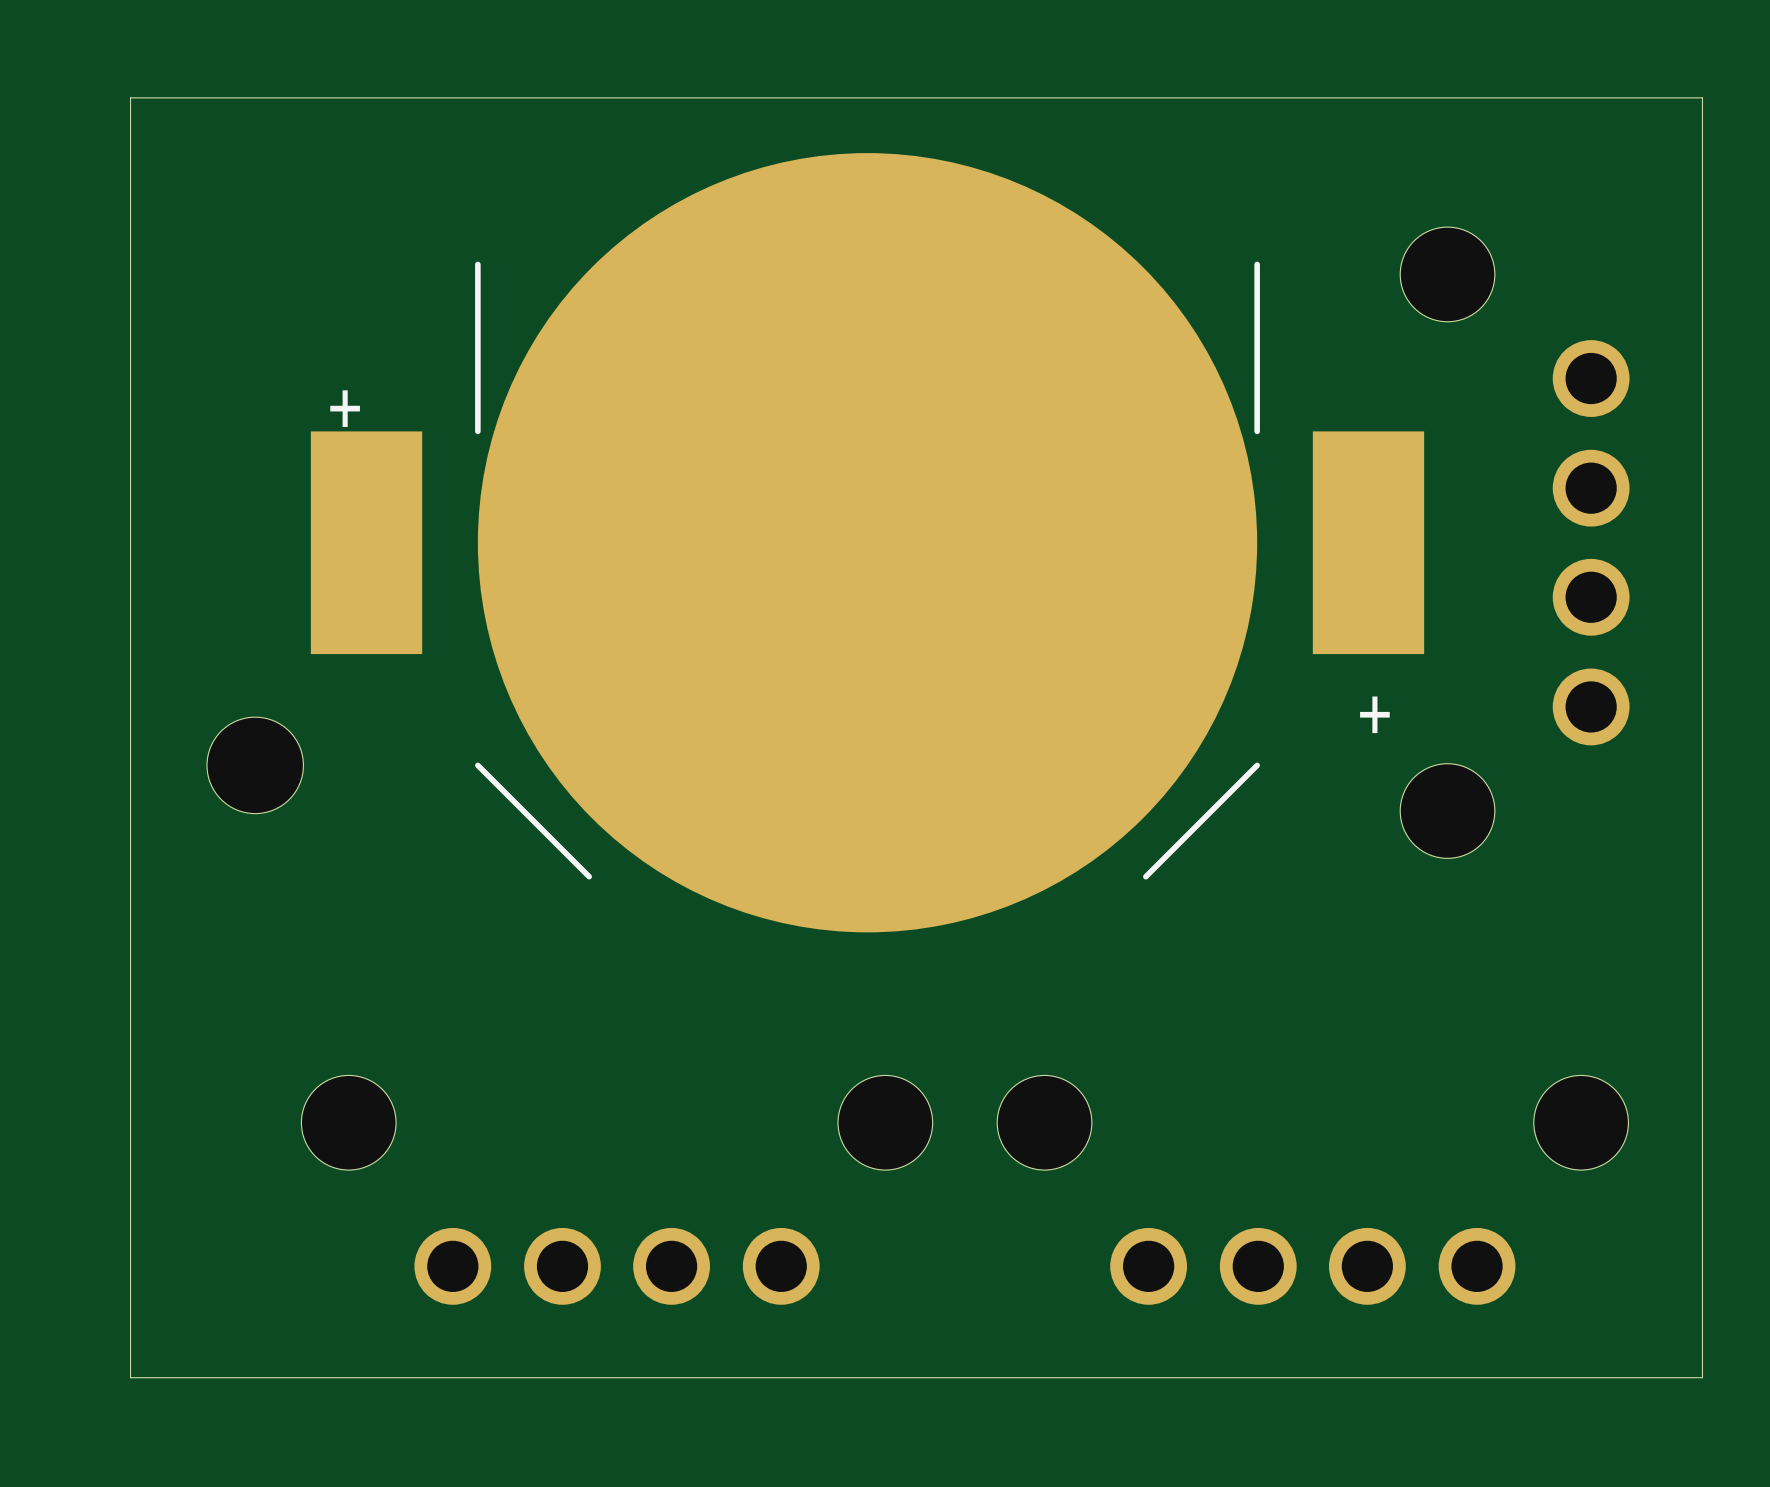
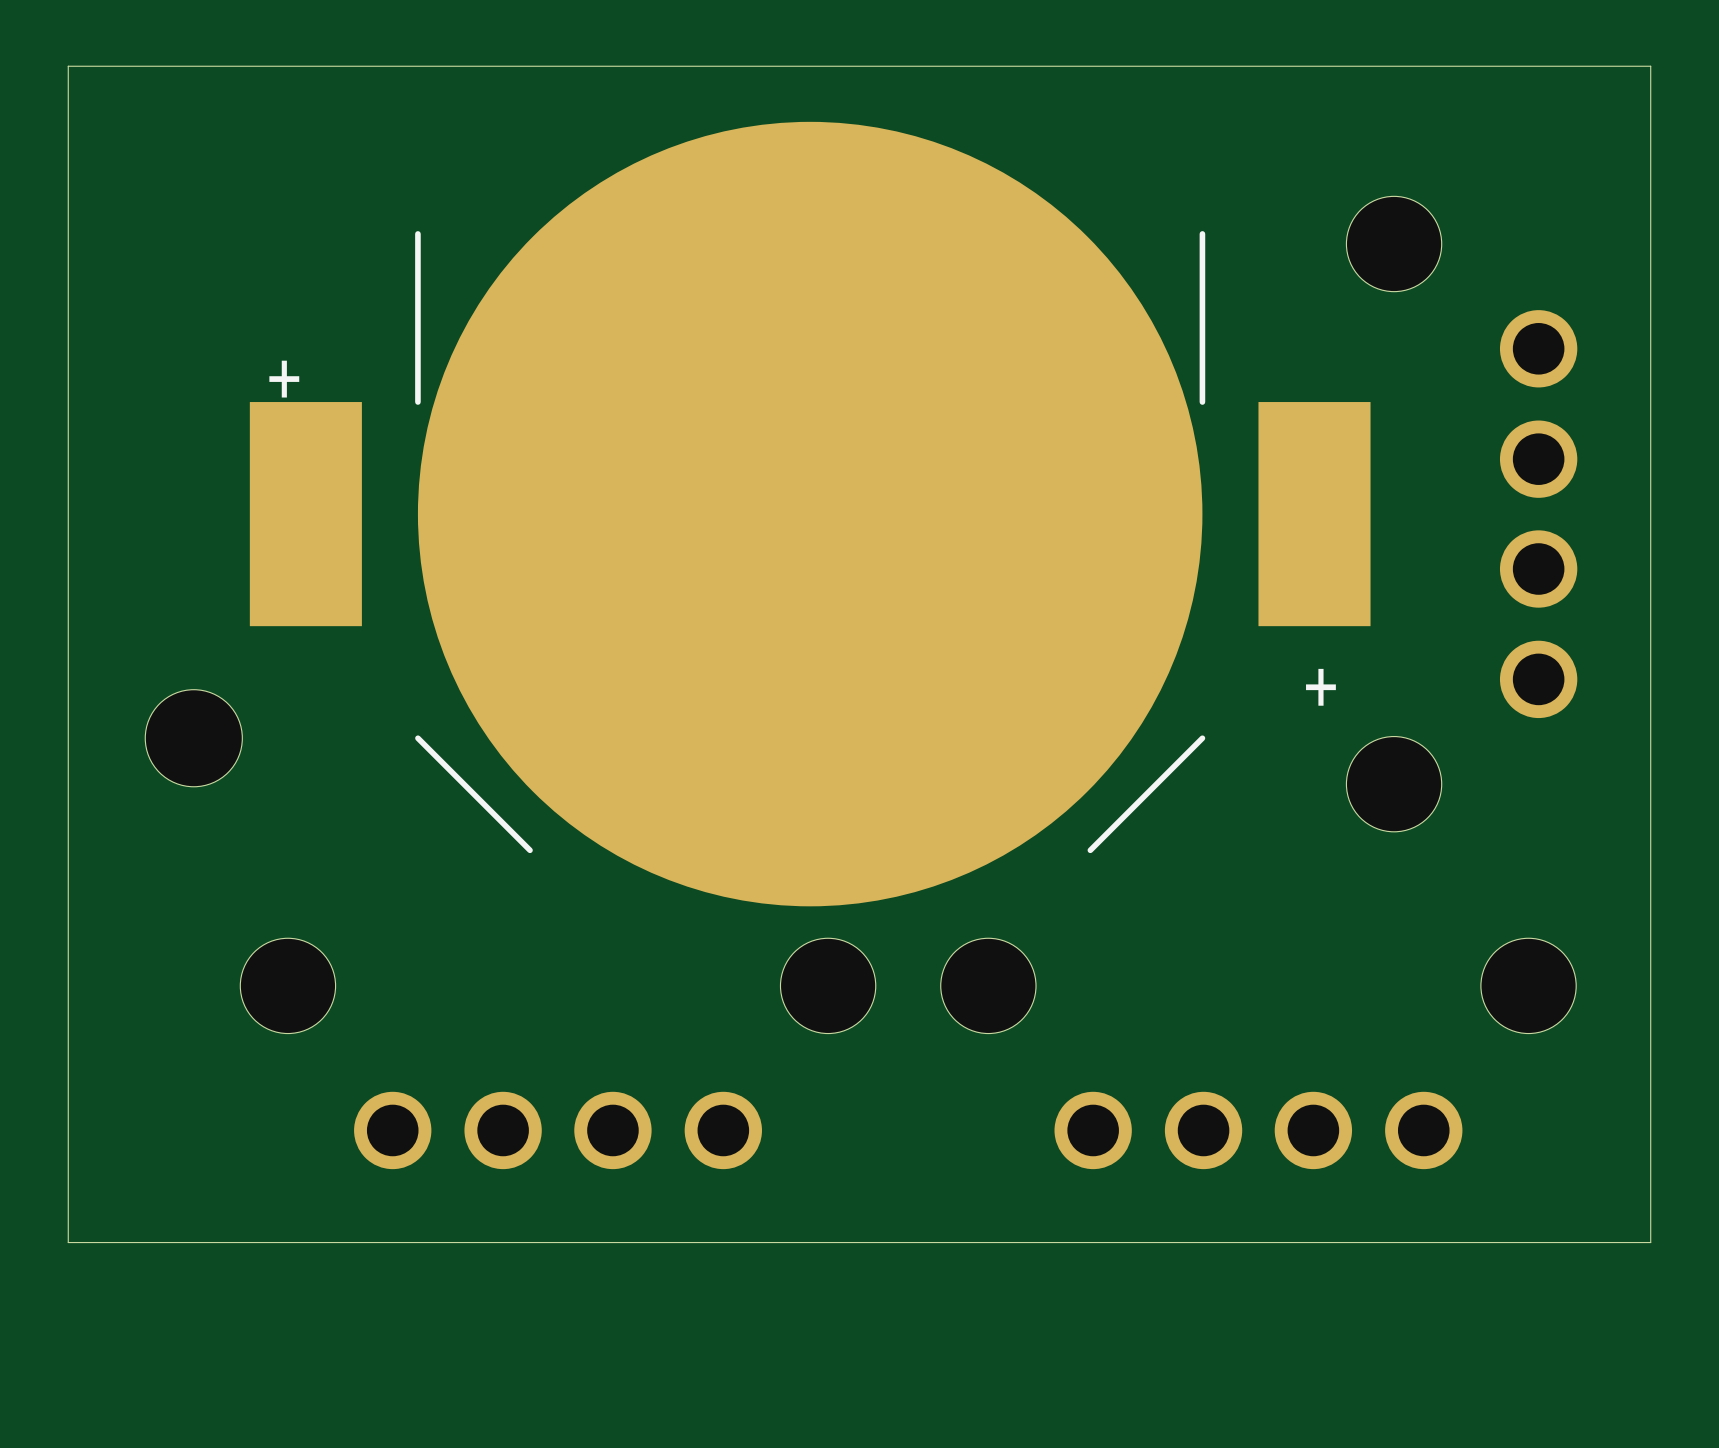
part position: (617, 1190) -> (558, 1053)
part position: (1312, 1190) -> (1258, 1053)
board edge: (1702, 1266) (1702, 1377) (130, 1377) (130, 1266) -> (1650, 1242) (68, 1242)

